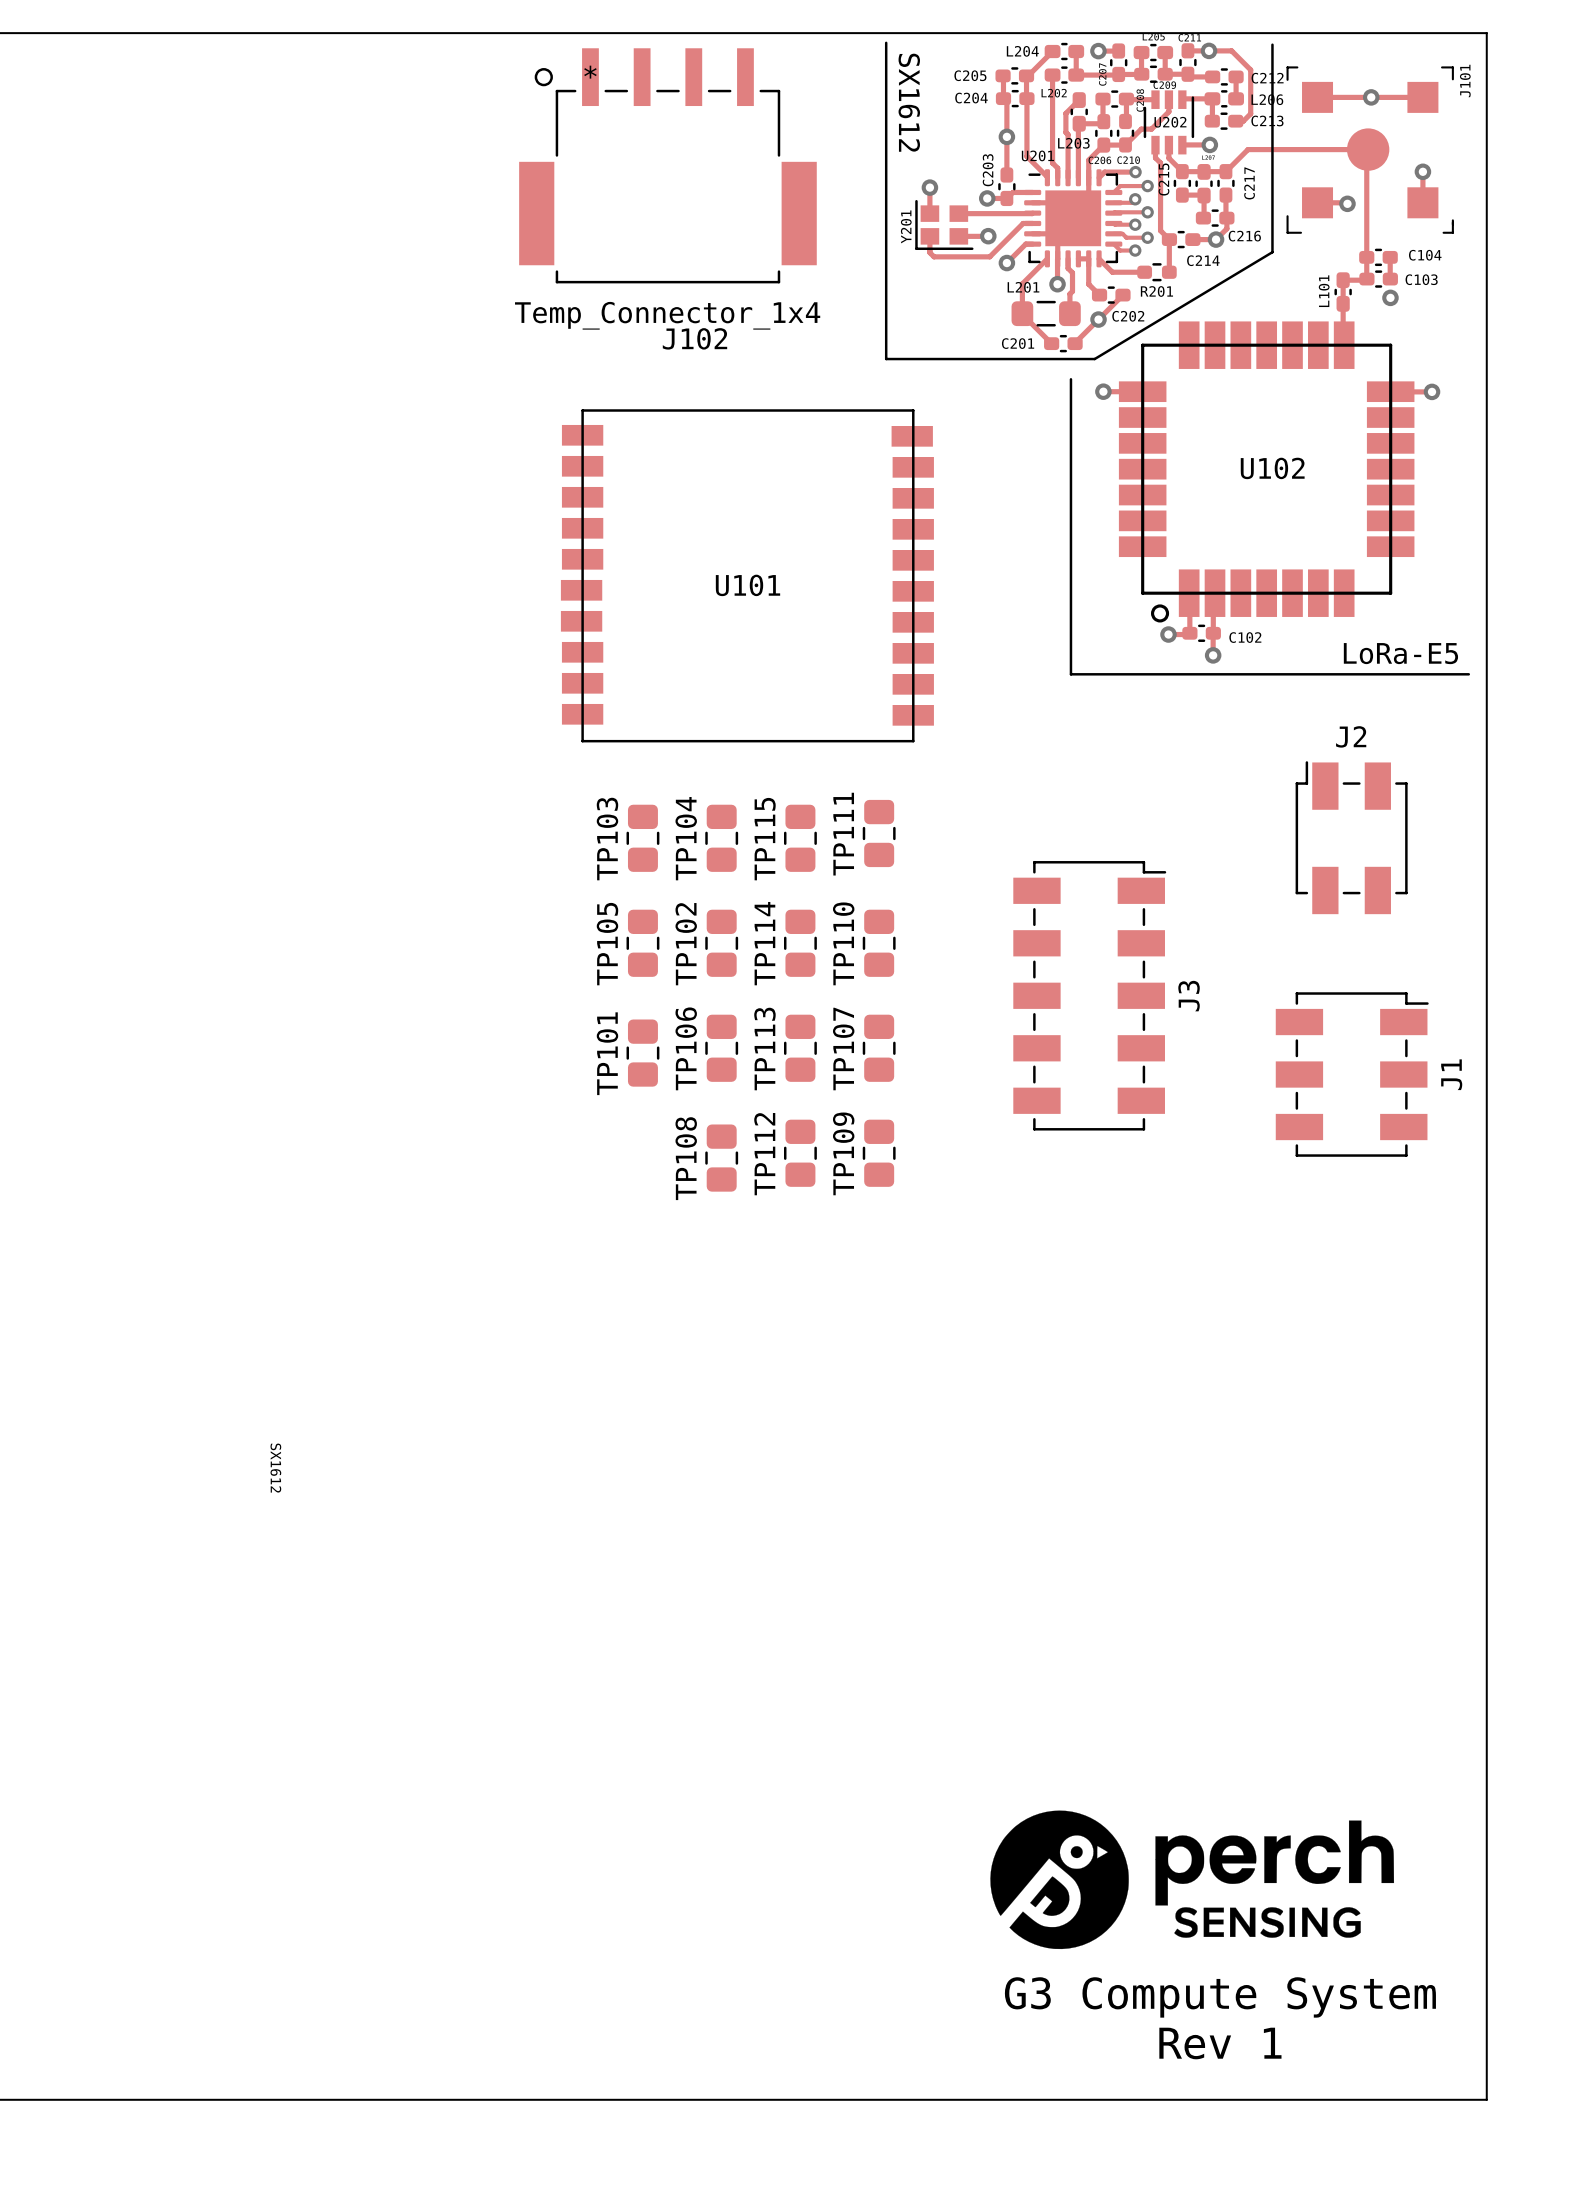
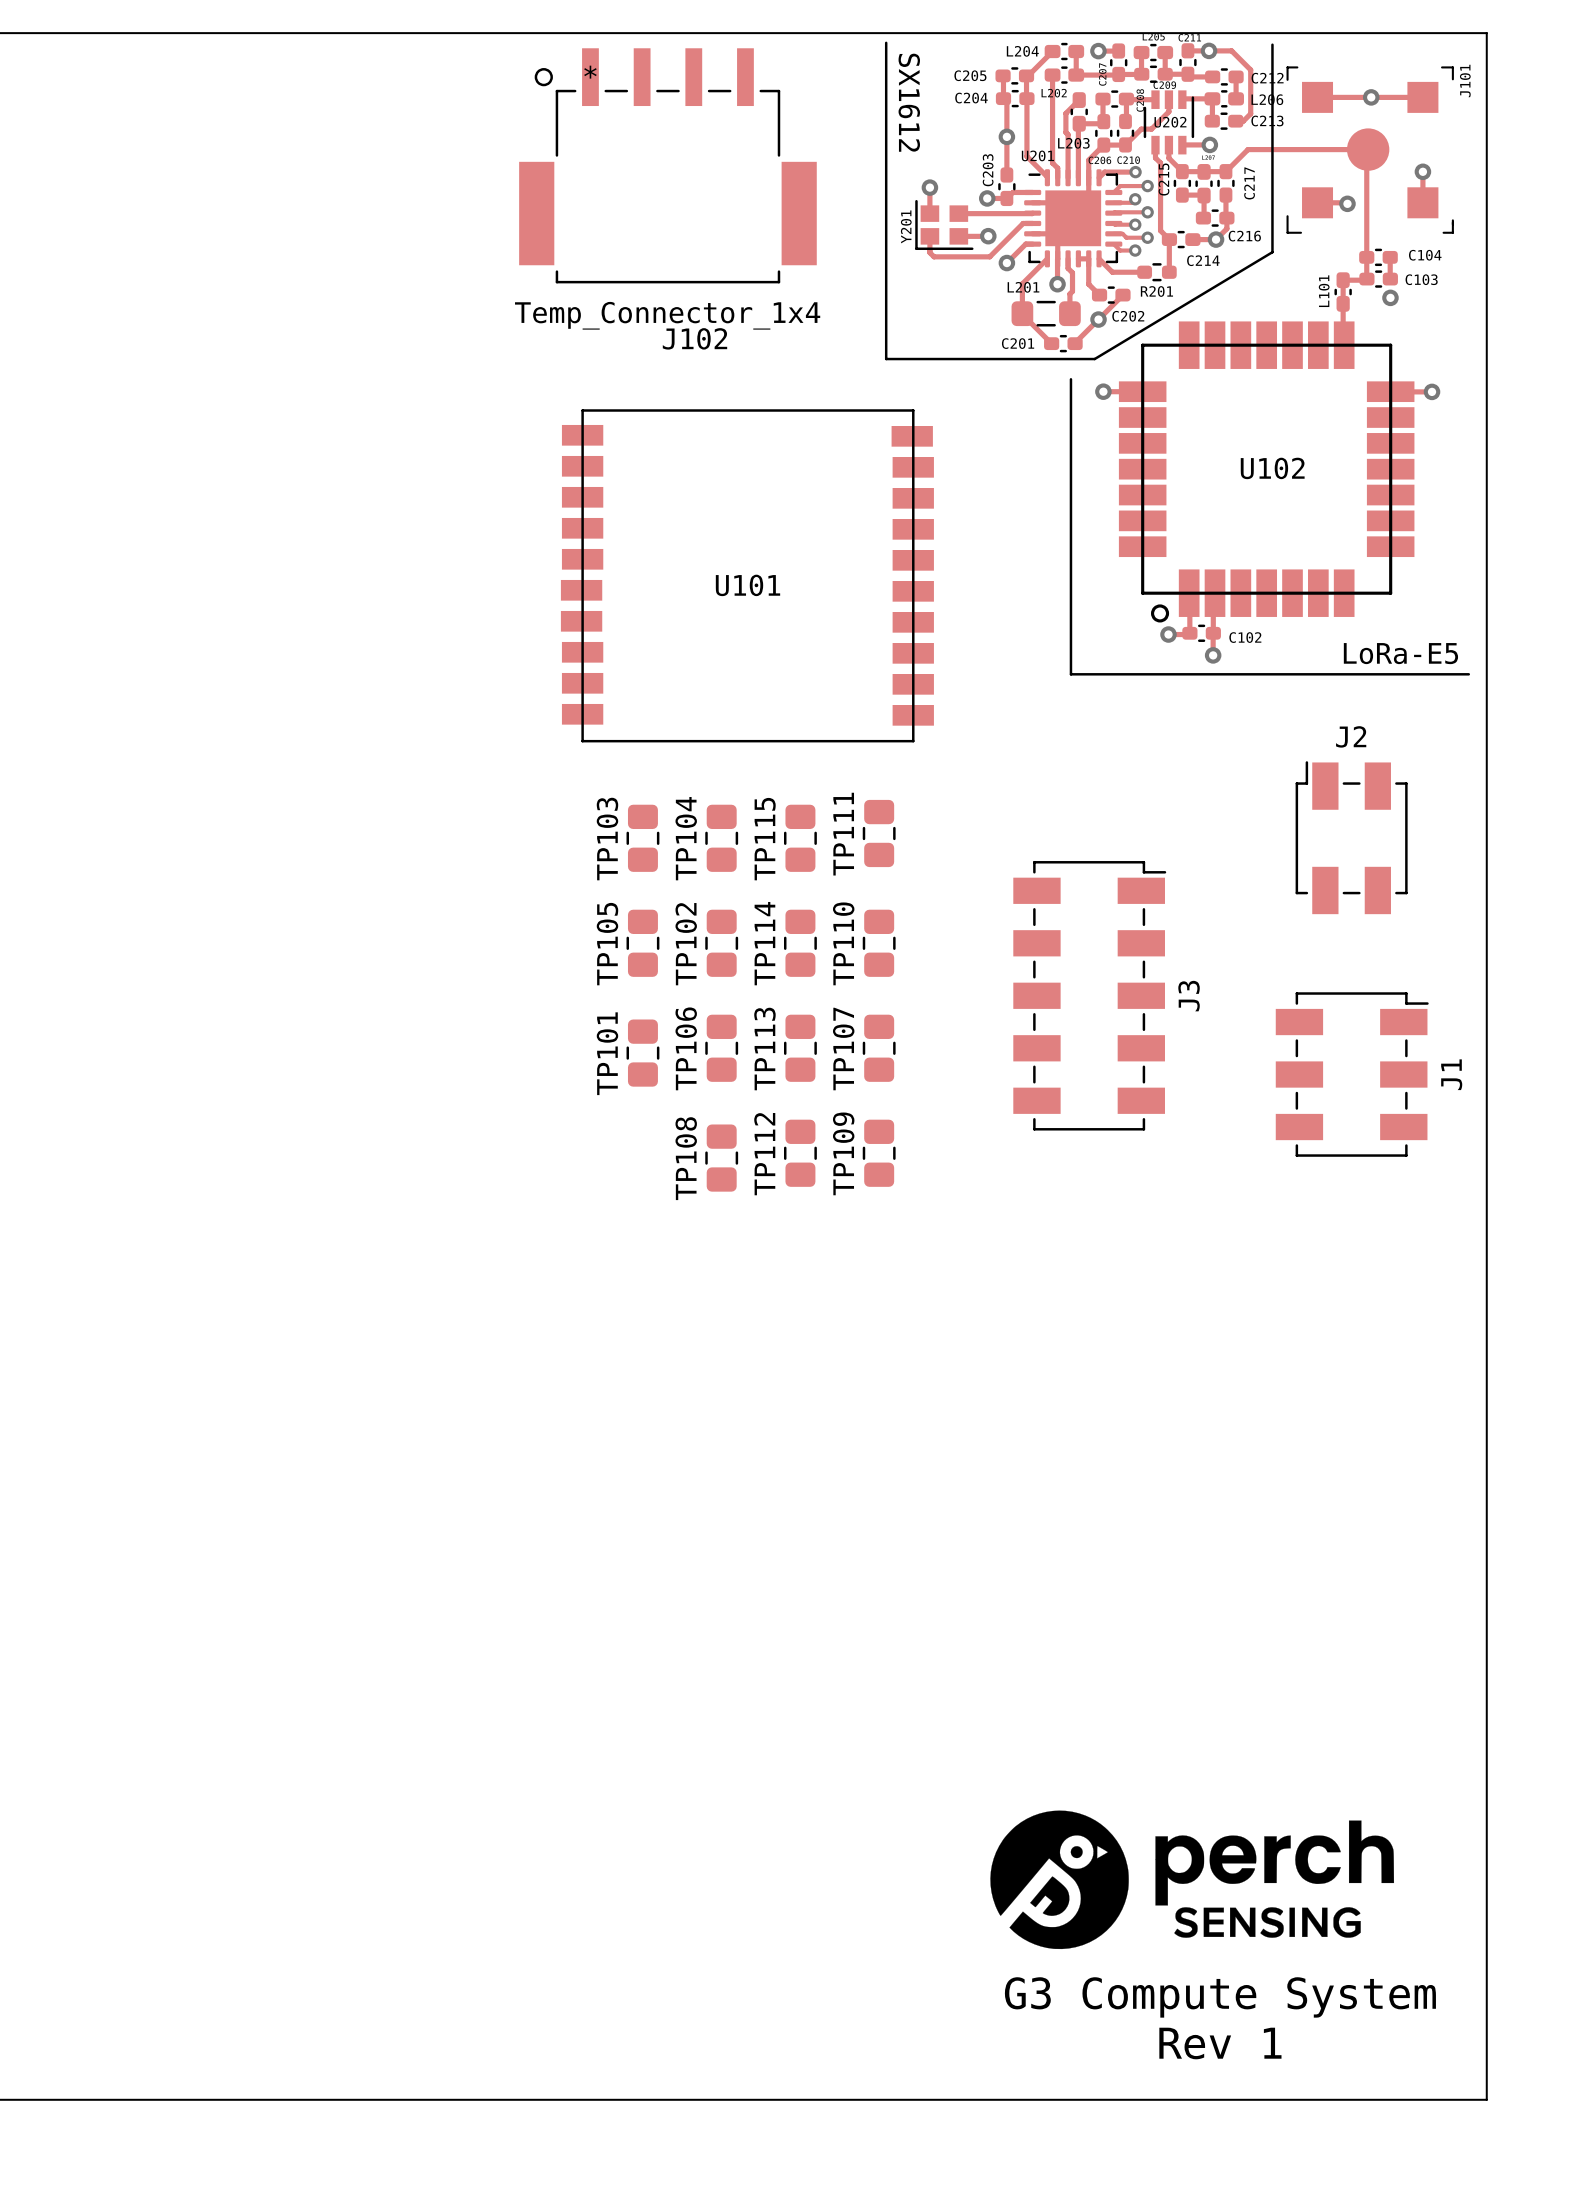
text: SX1612 (275, 1468) -> none

